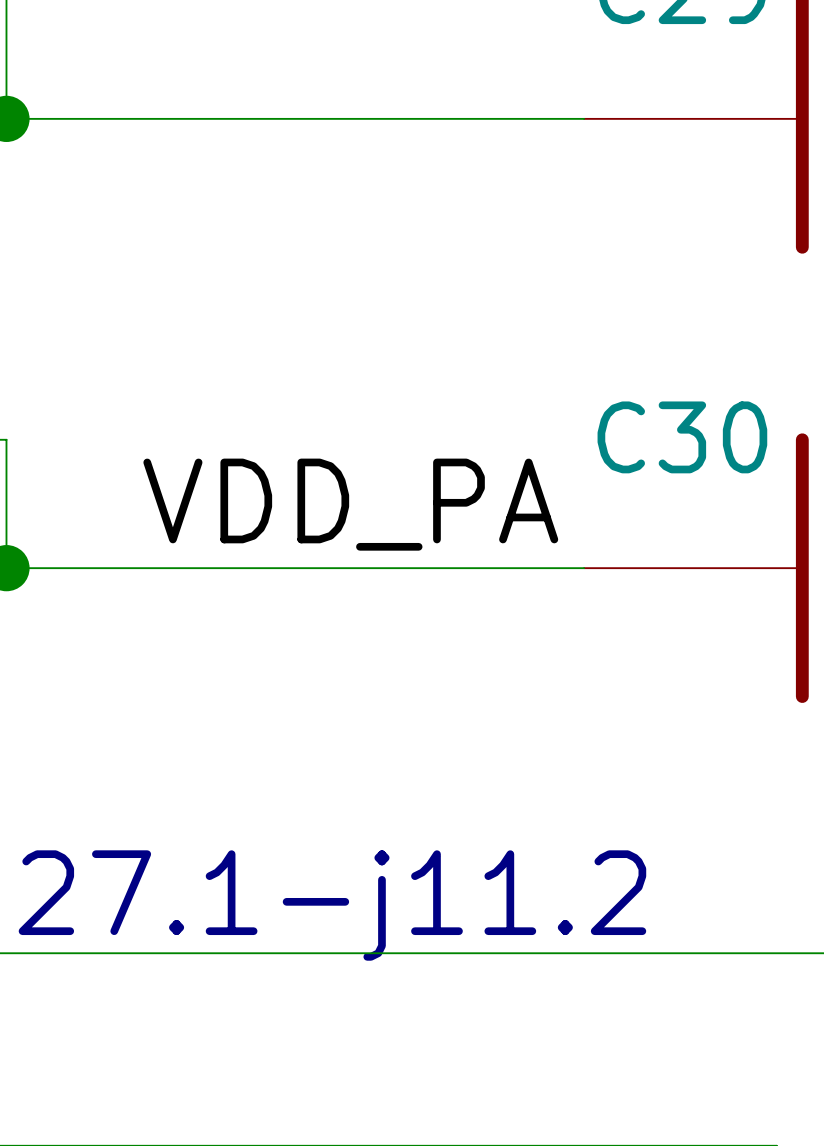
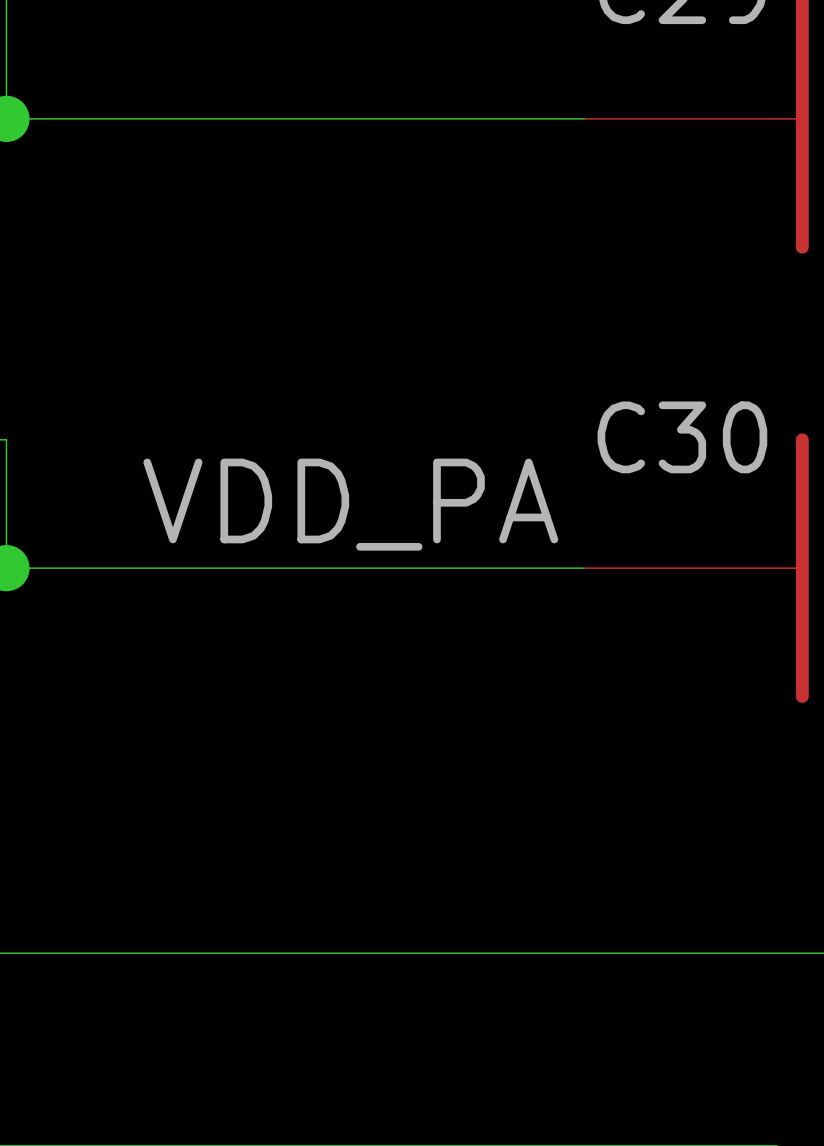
text: 27.1-j11.2 (332, 905) -> none

